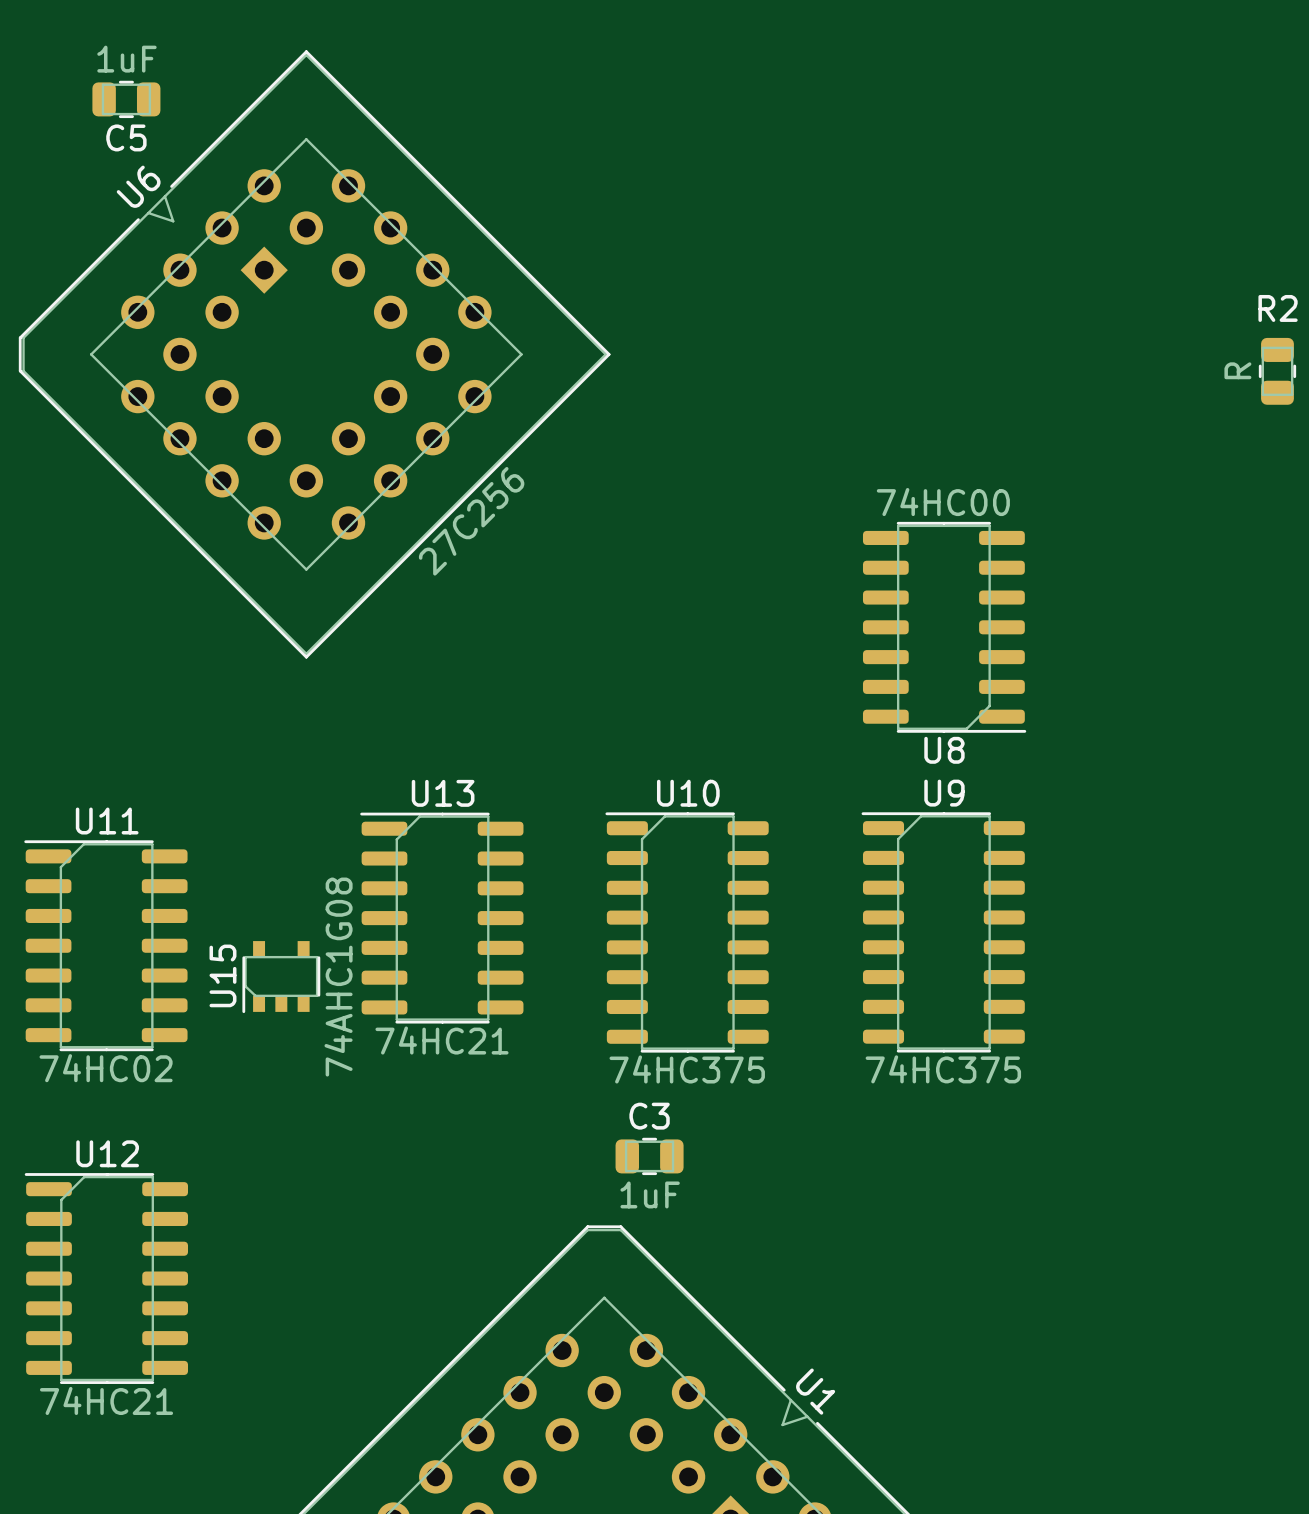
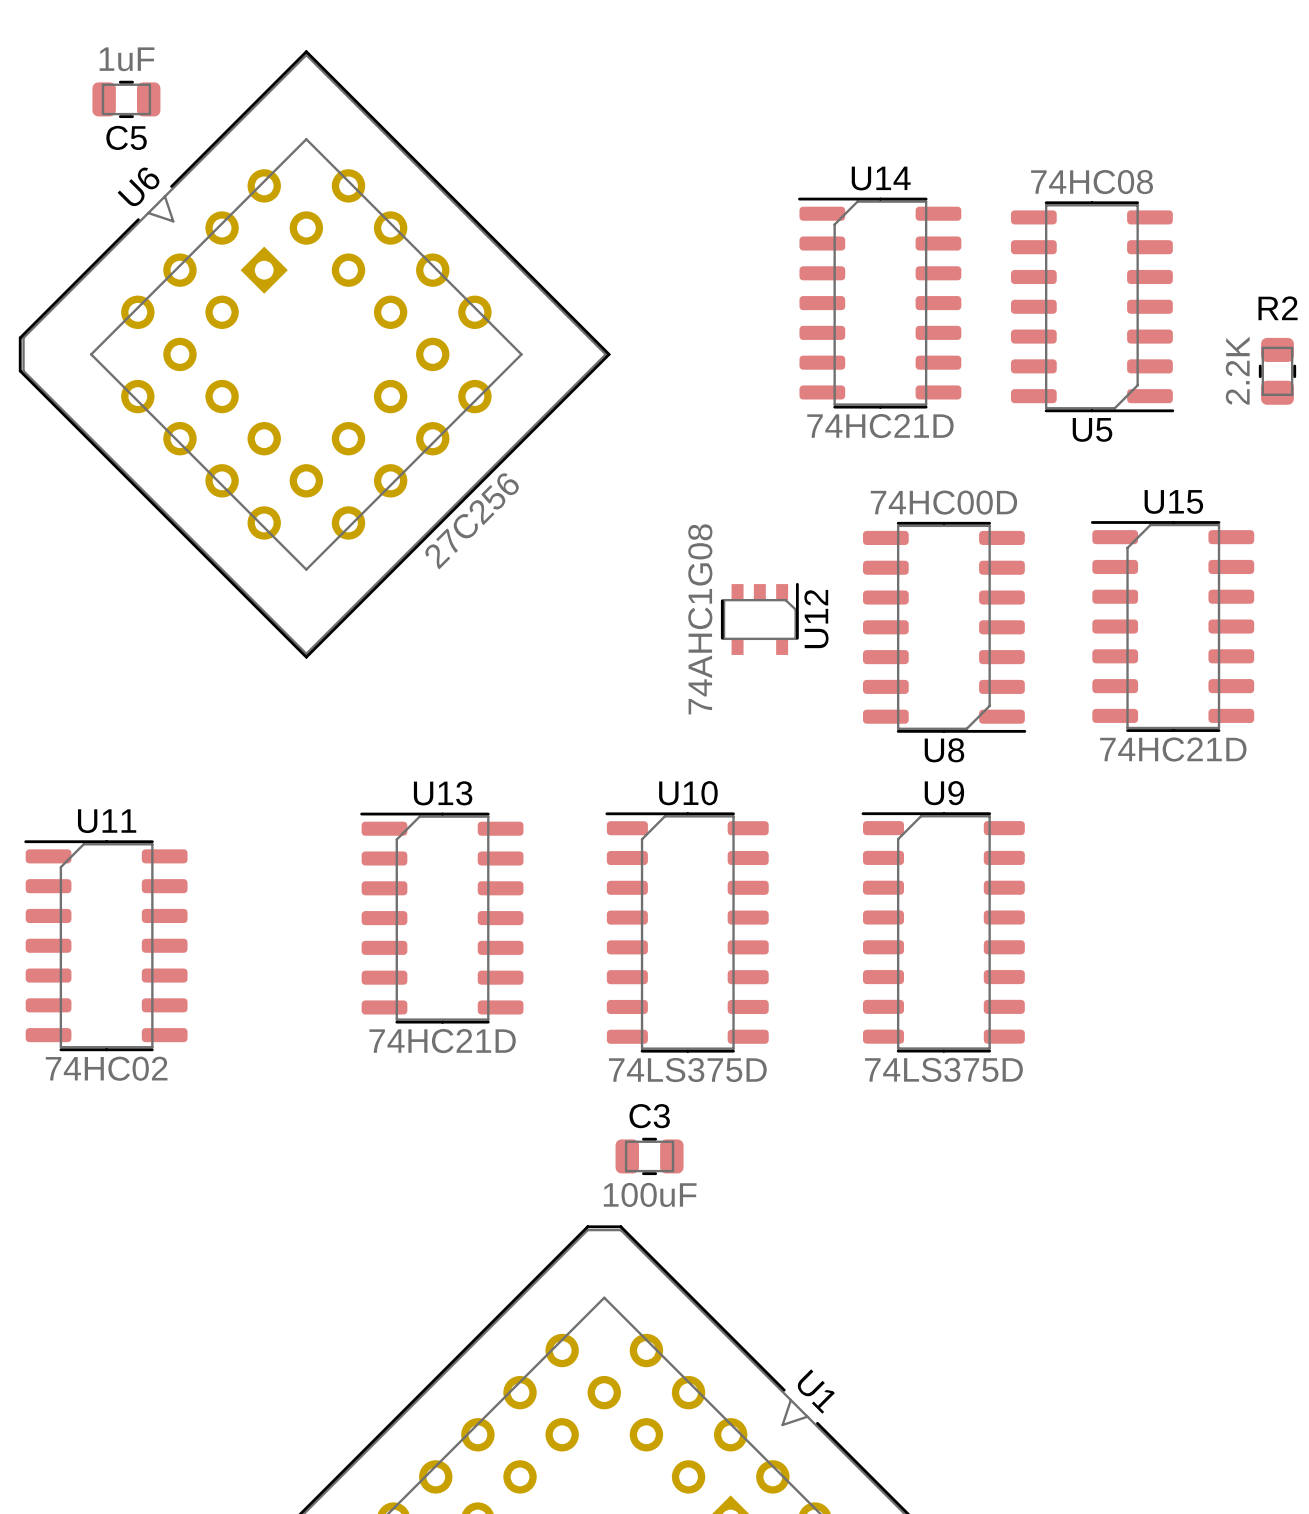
U14: none -> 74HC21D (879, 303)
U5: none -> 74HC08 (1092, 306)
R2 value: R (1237, 370) -> 2.2K (1237, 370)
U8 value: 74HC00 (943, 502) -> 74HC00D (943, 502)
U15 footprint: [242, 941, 321, 1014] -> [1090, 521, 1255, 732]
U15 name position: U15 (222, 975) -> U15 (1173, 501)
U15 value: 74AHC1G08 (338, 977) -> 74HC21D (1173, 749)
U13 value: 74HC21 (441, 1040) -> 74HC21D (442, 1041)
U10 value: 74HC375 (687, 1069) -> 74LS375D (687, 1070)
U9 value: 74HC375 (943, 1069) -> 74LS375D (943, 1069)
U12 name position: U12 (107, 1153) -> U12 (816, 619)
U12 footprint: [24, 1173, 189, 1384] -> [720, 582, 799, 655]
C3 value: 1uF (650, 1194) -> 100uF (650, 1194)
U12 value: 74HC21 (106, 1400) -> 74AHC1G08 (700, 619)

